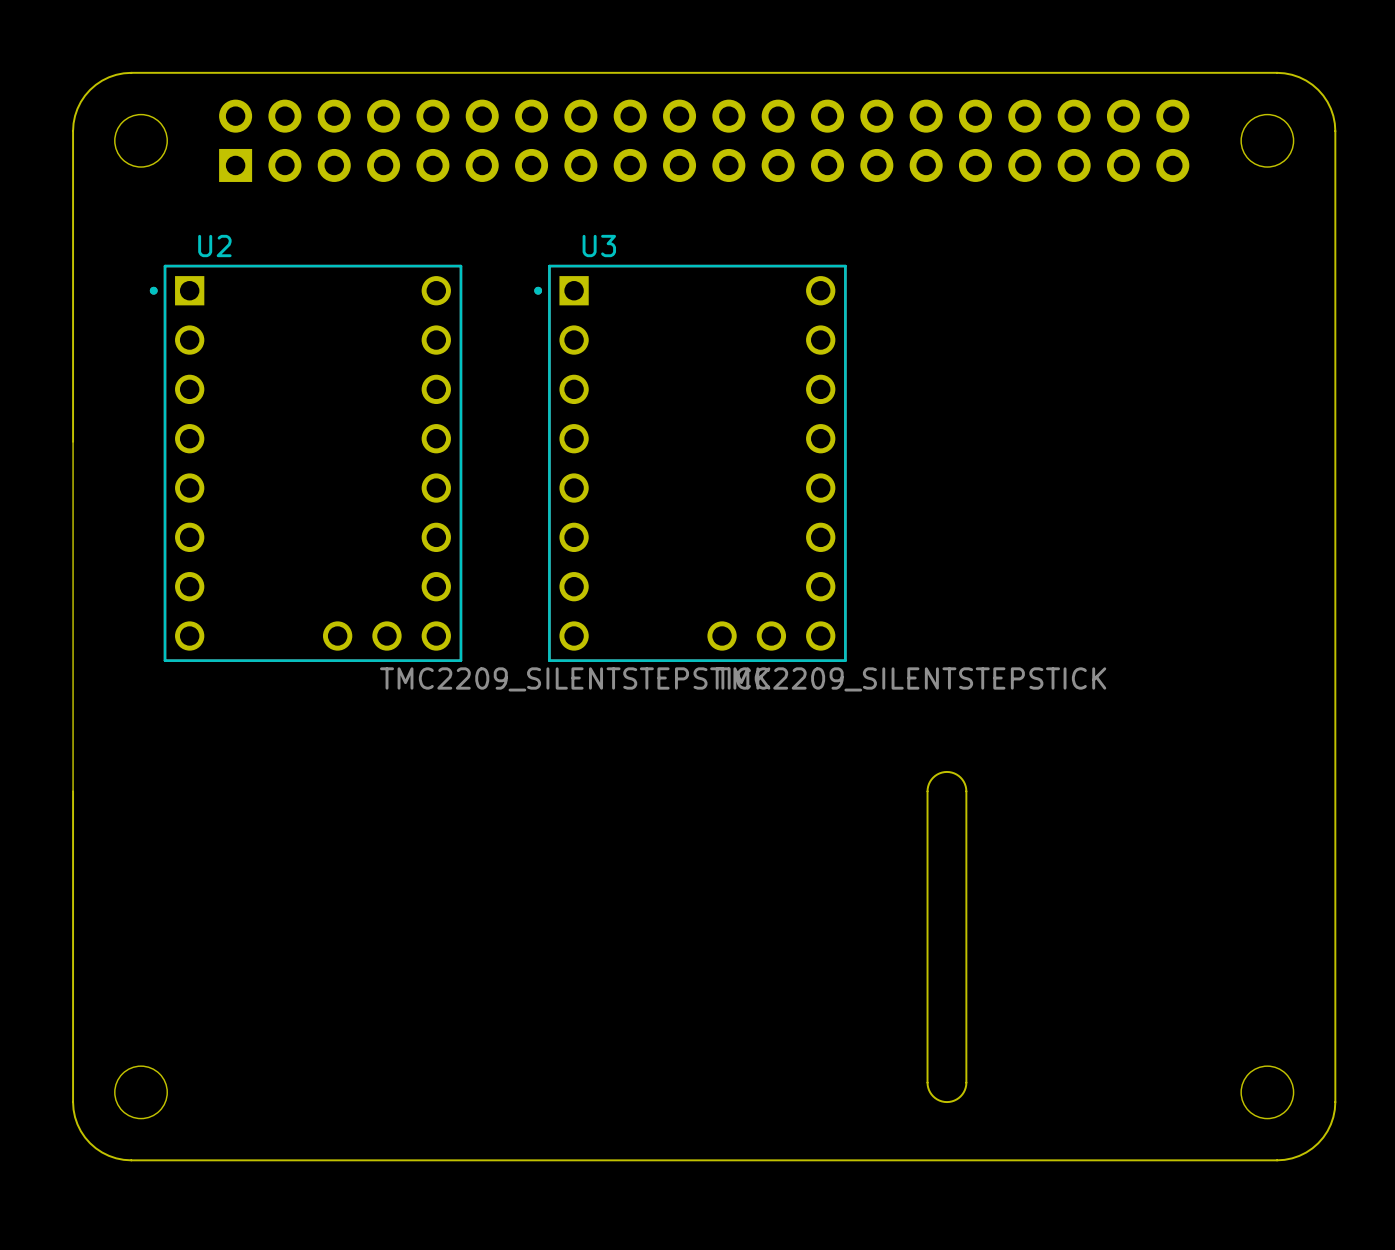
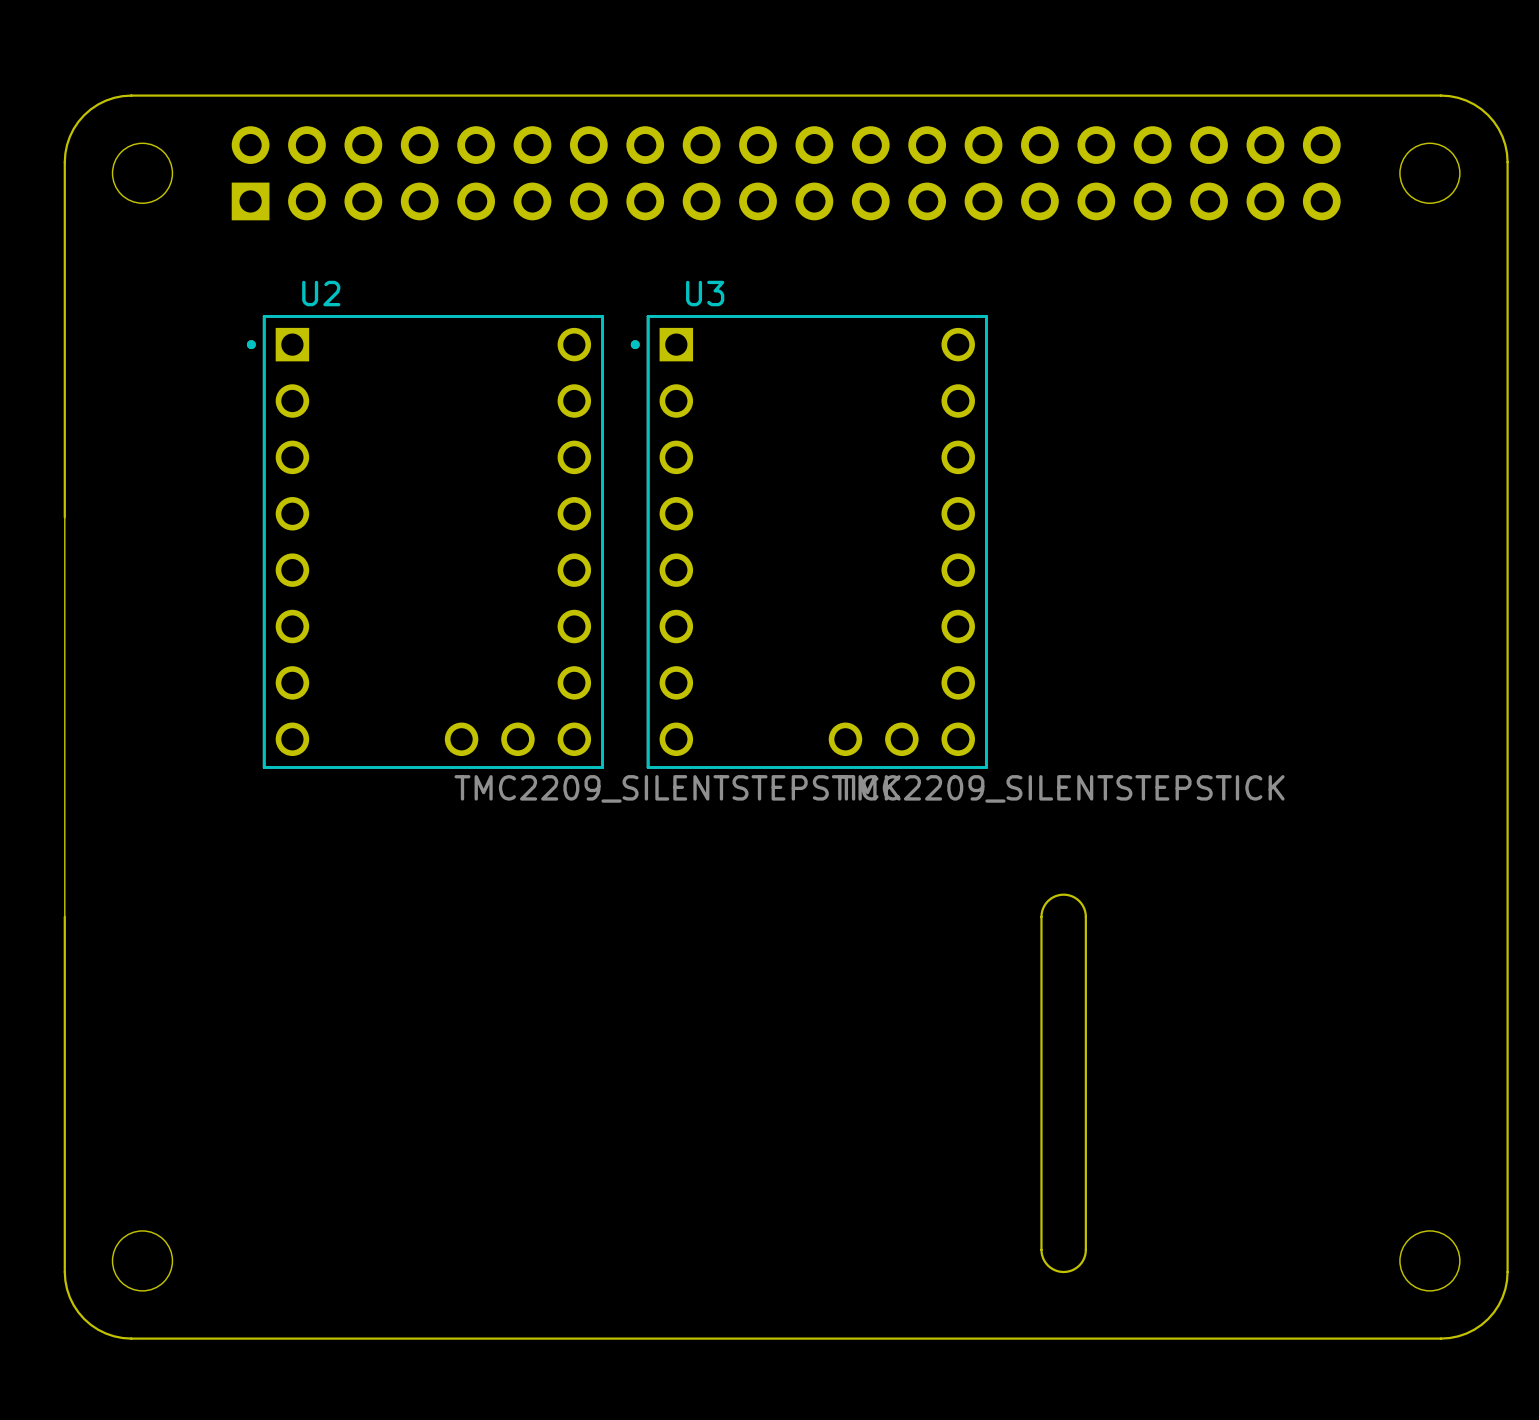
U2 position: (306, 463) -> (425, 541)
U3 position: (690, 463) -> (809, 541)
U2 value position: TMC2209_SILENTSTEPSTICK (575, 679) -> TMC2209_SILENTSTEPSTICK (677, 788)

